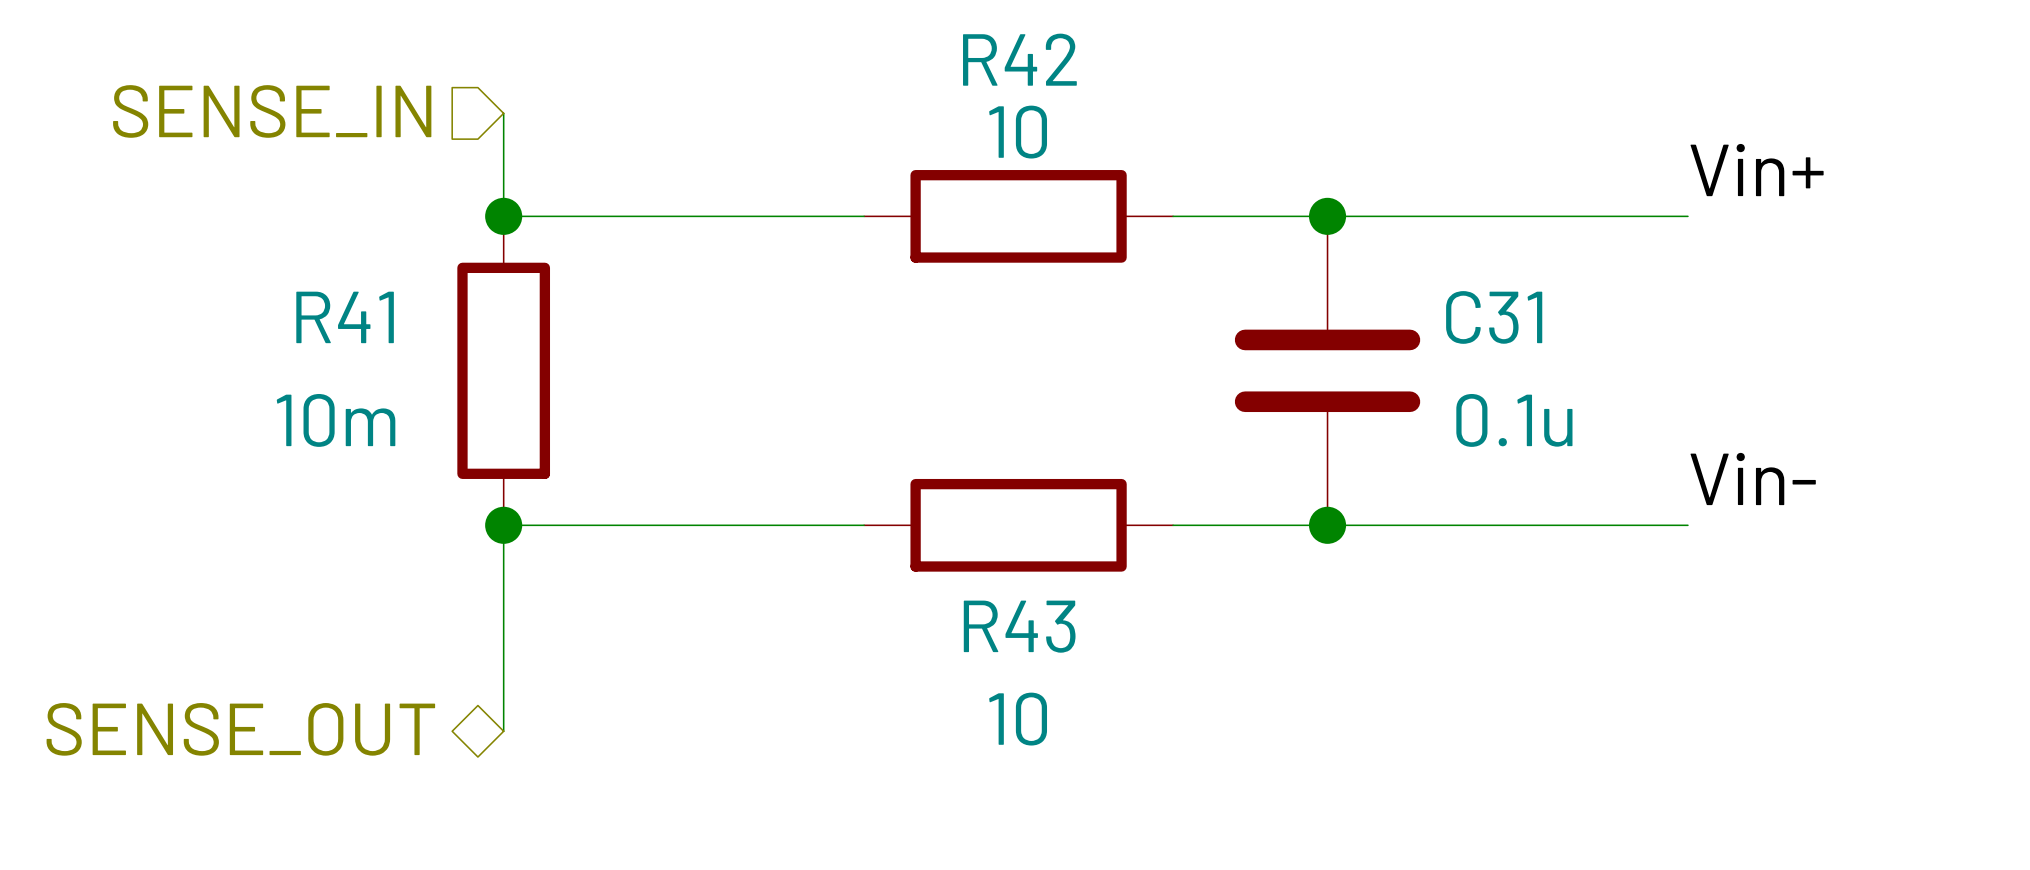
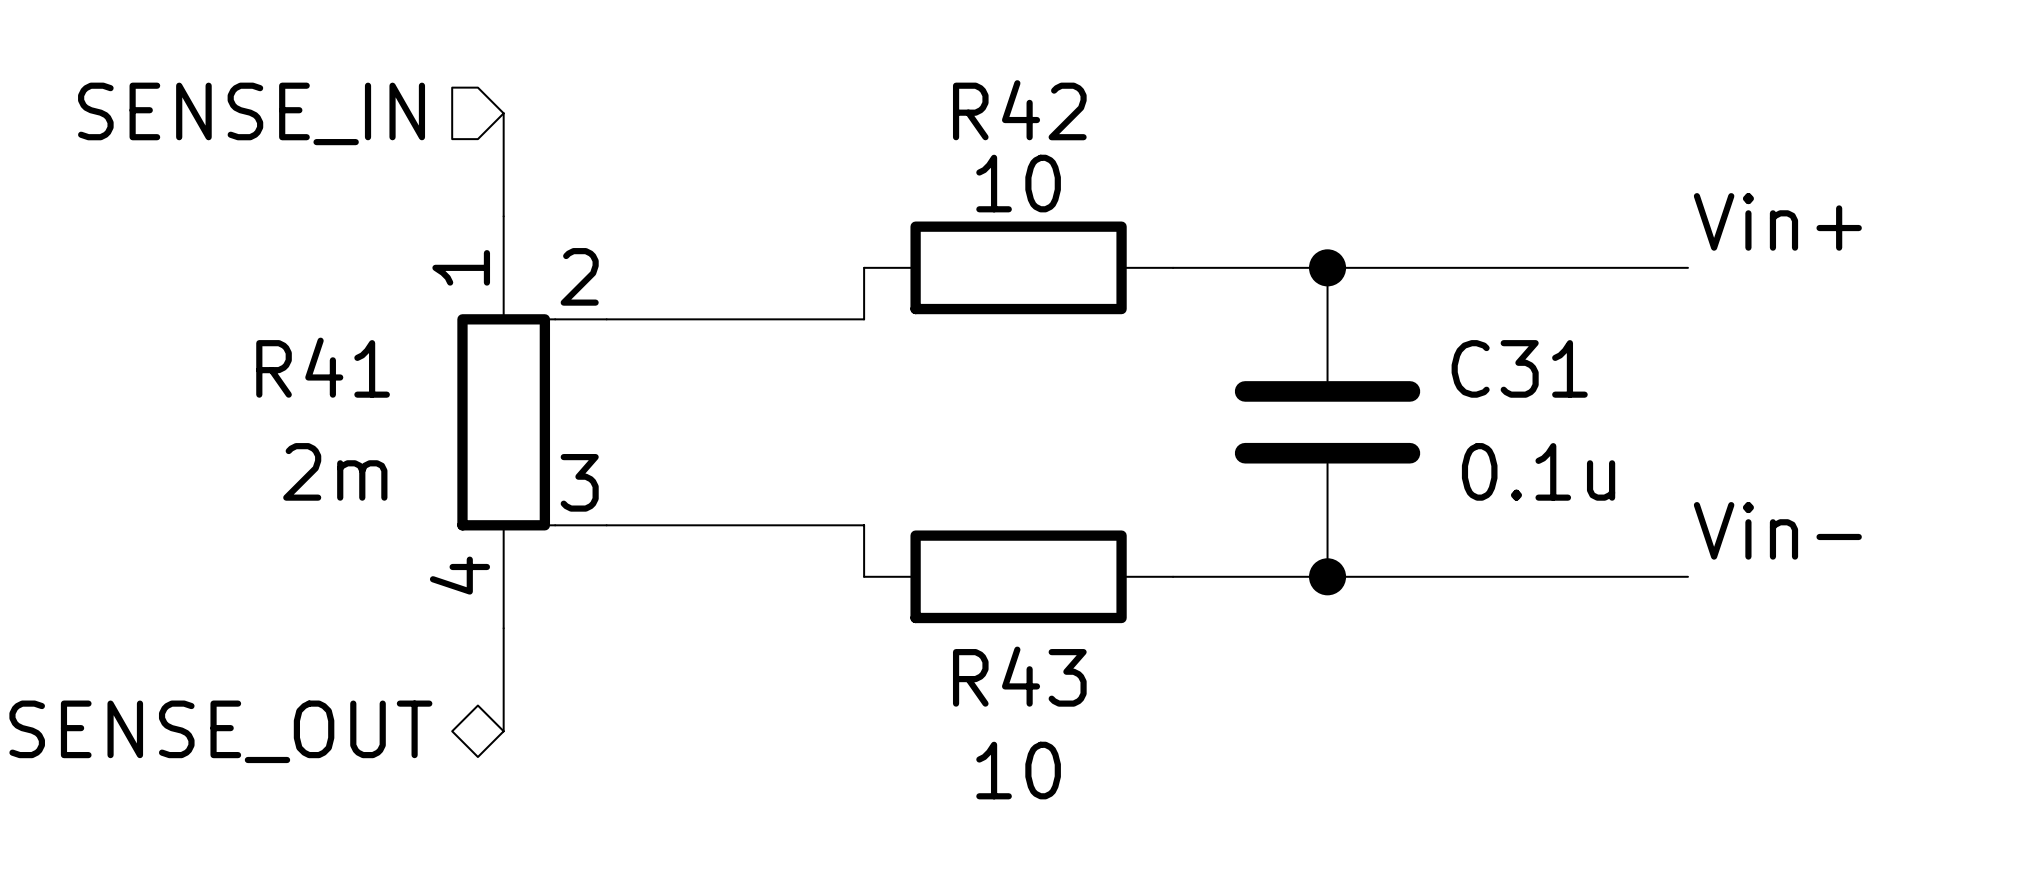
label position: Vin+ (1757, 170) -> Vin+ (1777, 221)
R41 symbol: [457, 216, 551, 526] -> [457, 216, 607, 629]
wire: (503, 216) (864, 216) -> none
junction: (503, 216) -> none
R42 position: (1018, 216) -> (1018, 267)
wire: (1173, 216) (1687, 216) -> (1173, 267) (1687, 267)
junction position: (1327, 216) -> (1327, 267)
wire: none -> (864, 267) (864, 319) (606, 319)
C31 position: (1327, 370) -> (1327, 422)
R41 value: 10m (336, 420) -> 2m (335, 471)
label position: Vin- (1753, 478) -> Vin- (1777, 530)
junction: (503, 525) -> none
wire: none -> (864, 525) (864, 576)
R43 position: (1018, 525) -> (1018, 576)
wire: (1173, 525) (1687, 525) -> (1173, 576) (1687, 576)
junction position: (1327, 525) -> (1327, 576)

